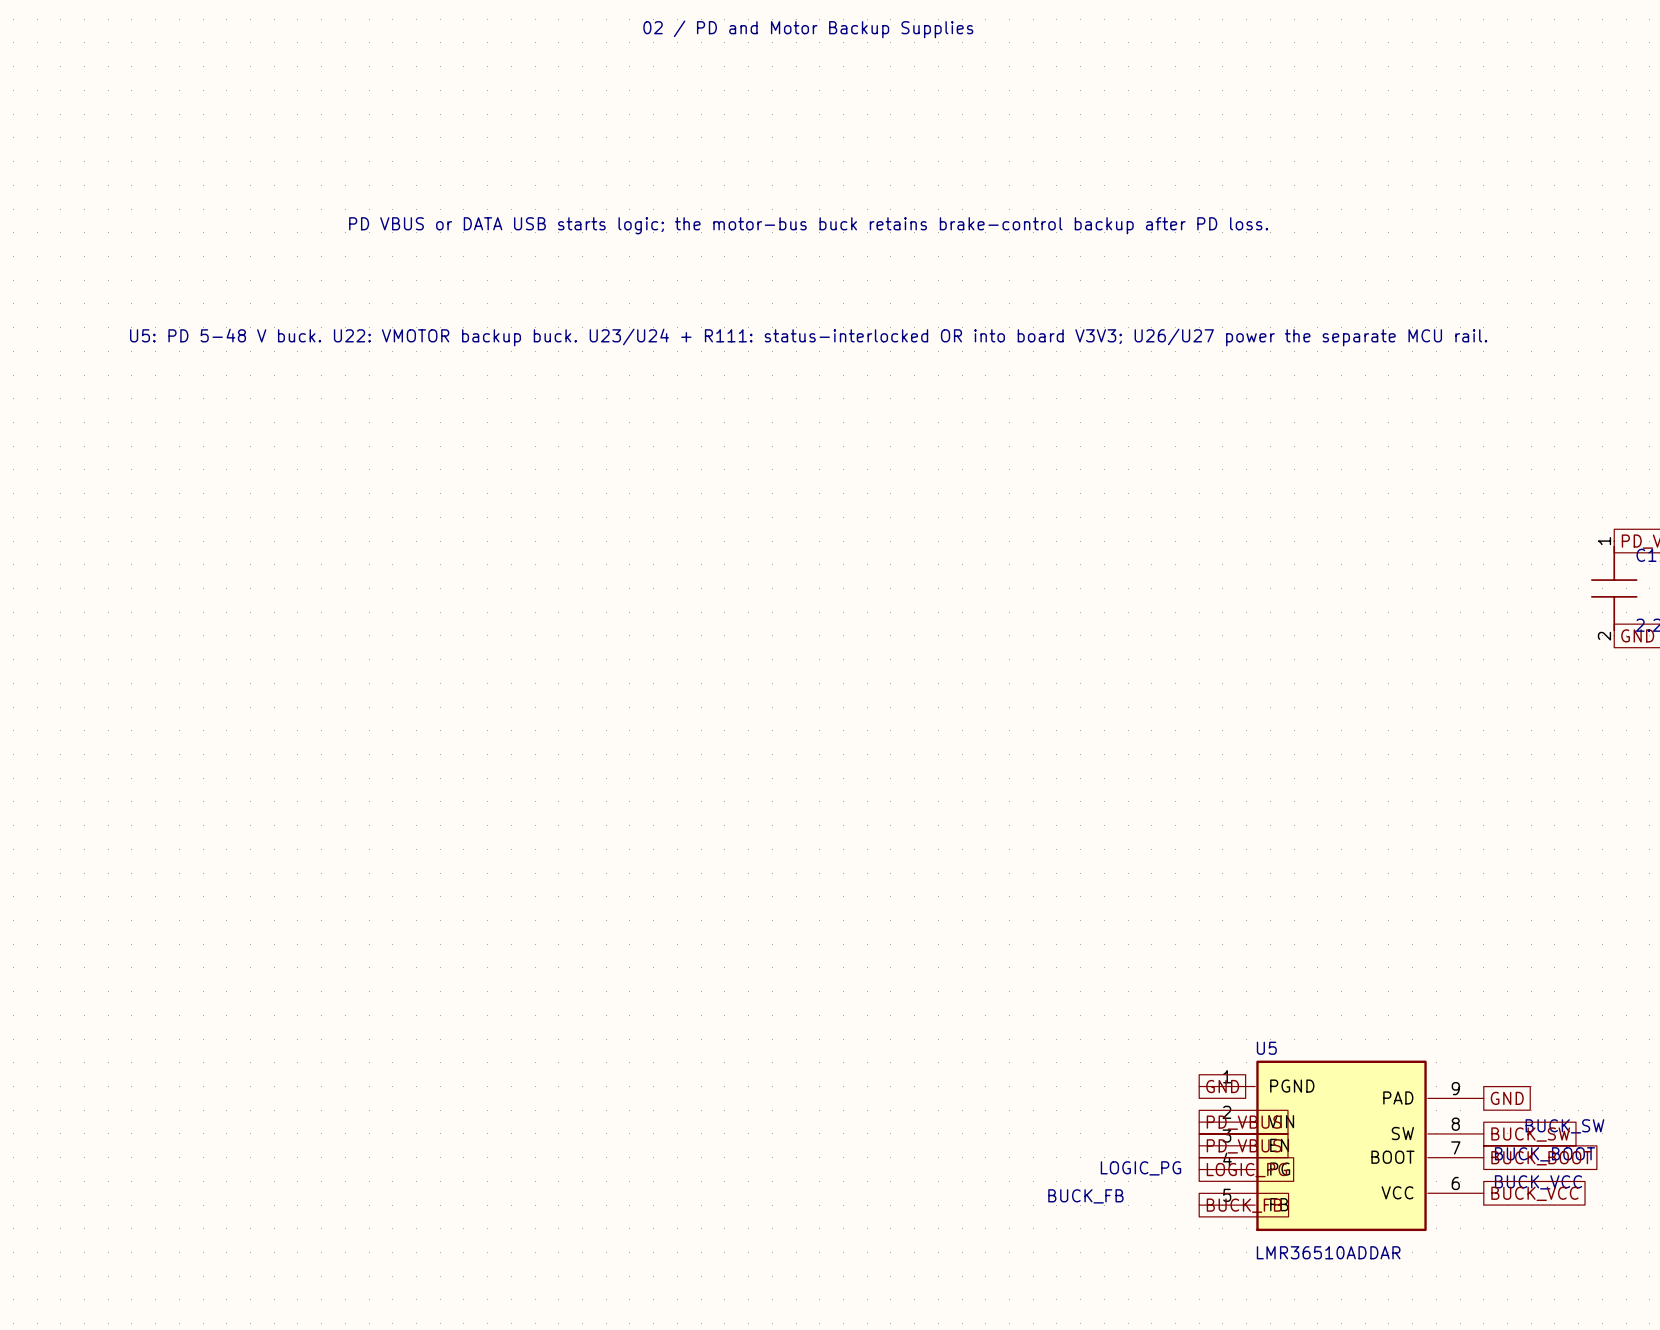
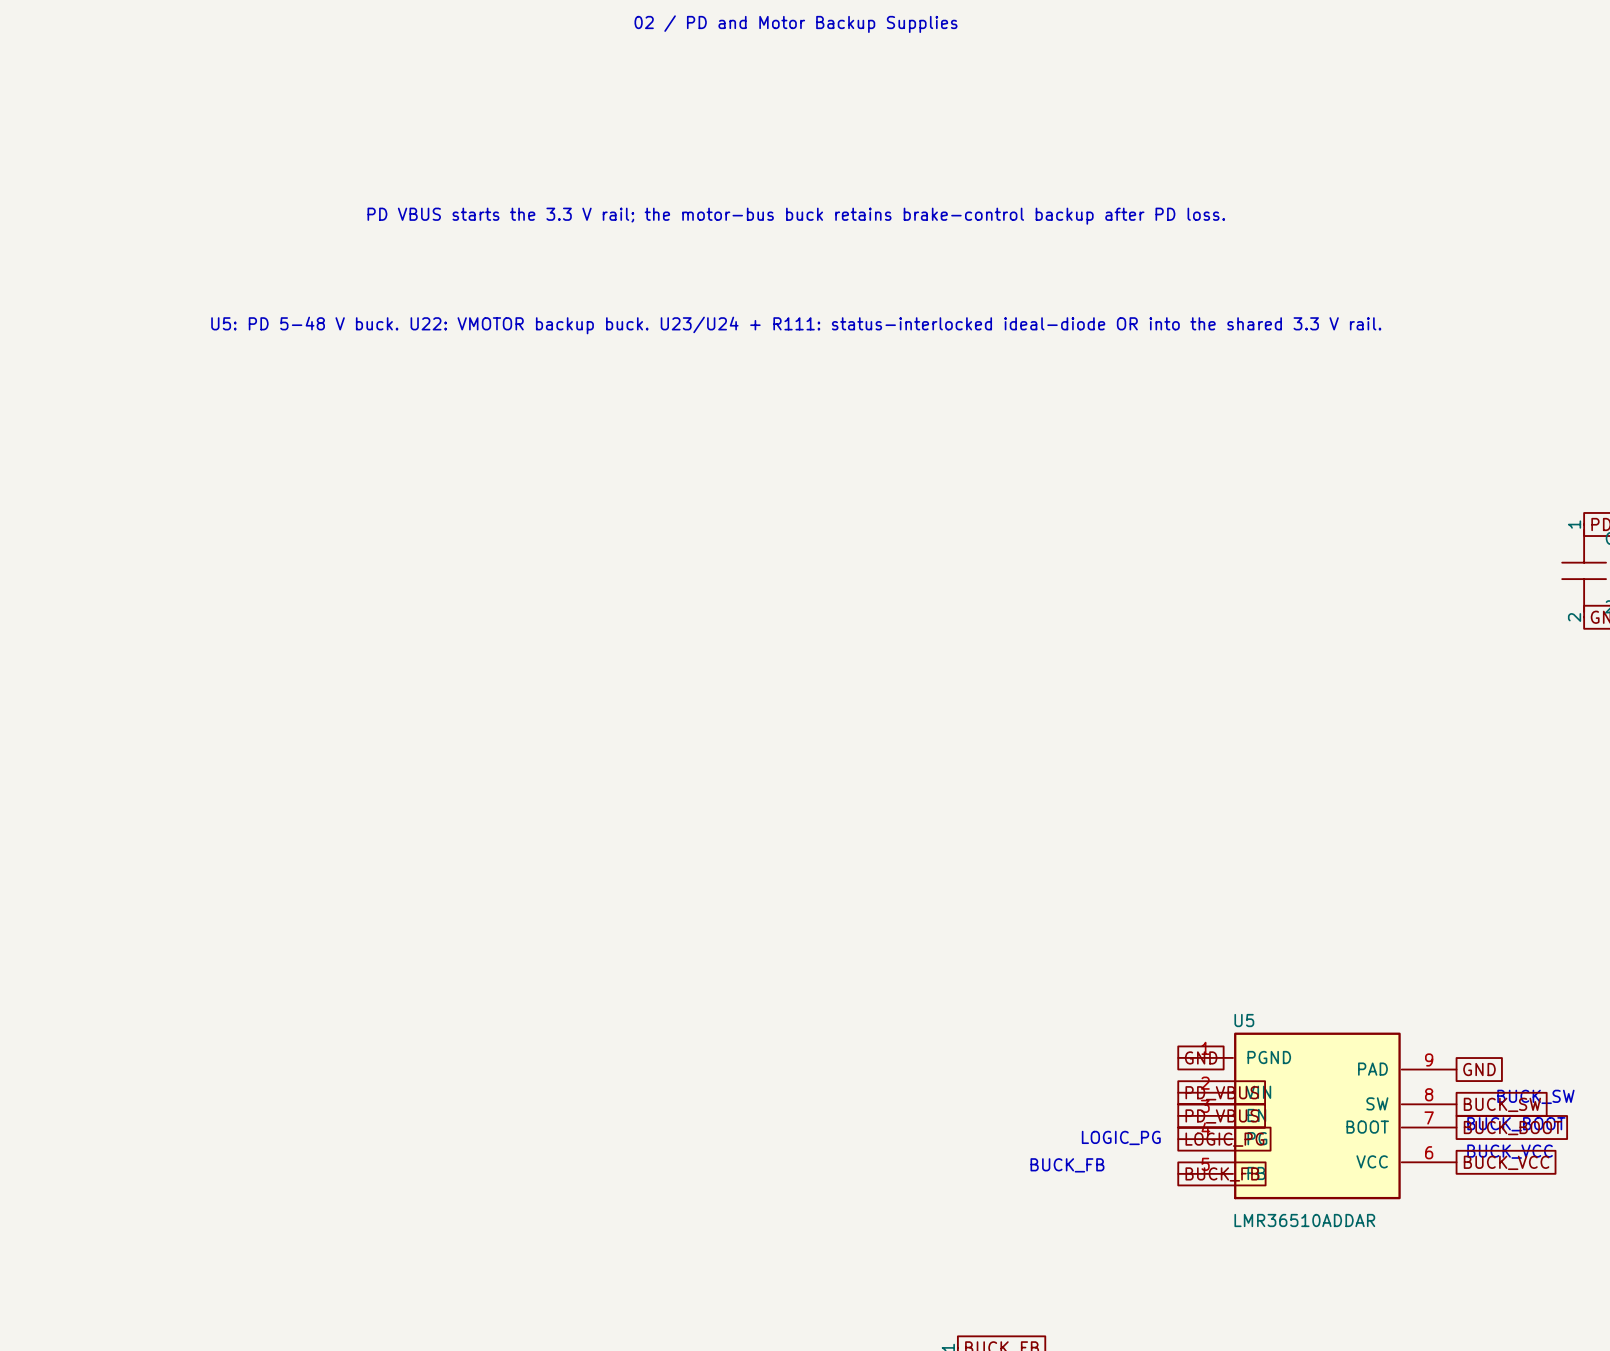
text: PD VBUS or DATA USB starts logic; the motor-bus buck retains brake-control backup after PD loss. (808, 225) -> PD VBUS starts the 3.3 V rail; the motor-bus buck retains brake-control backup after PD loss. (796, 216)
text: U5: PD 5-48 V buck. U22: VMOTOR backup buck. U23/U24 + R111: status-interlocked OR into board V3V3; U26/U27 power the separate MCU rail. (808, 337) -> U5: PD 5-48 V buck. U22: VMOTOR backup buck. U23/U24 + R111: status-interlocked ideal-diode OR into the shared 3.3 V rail. (796, 325)

